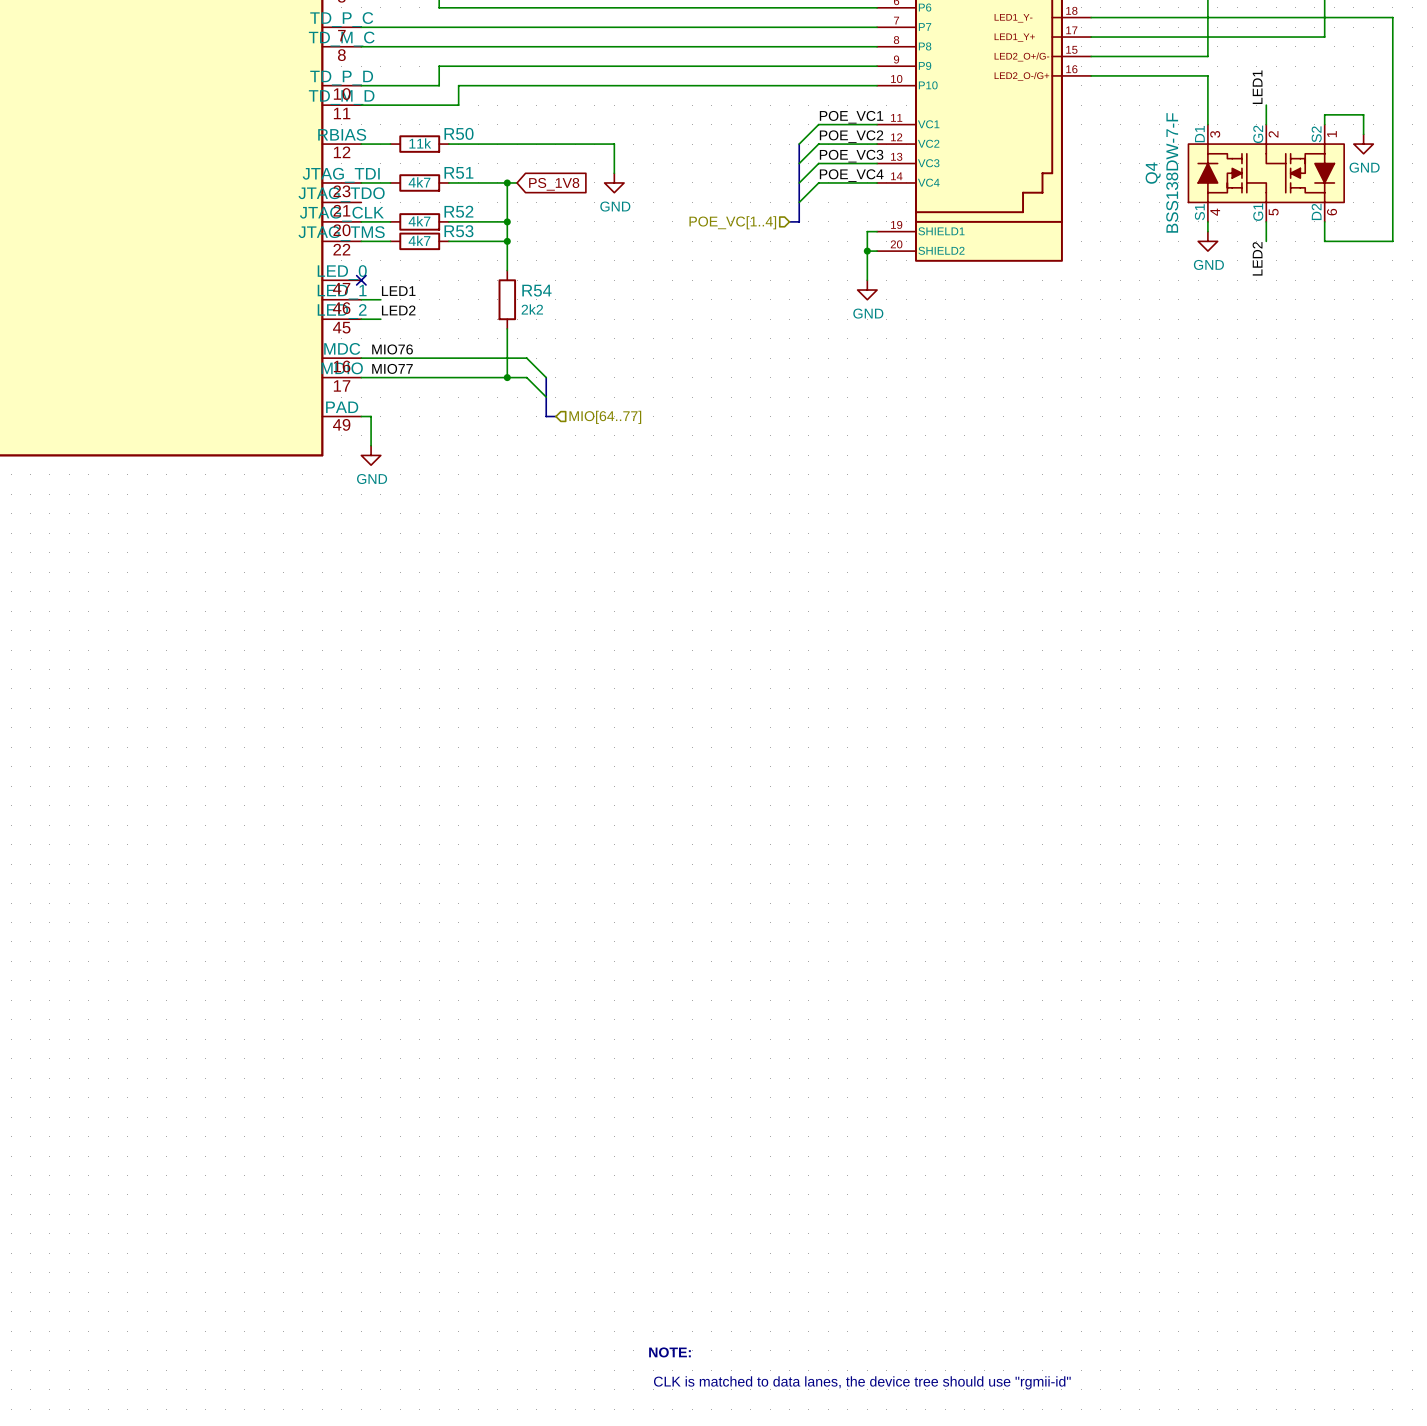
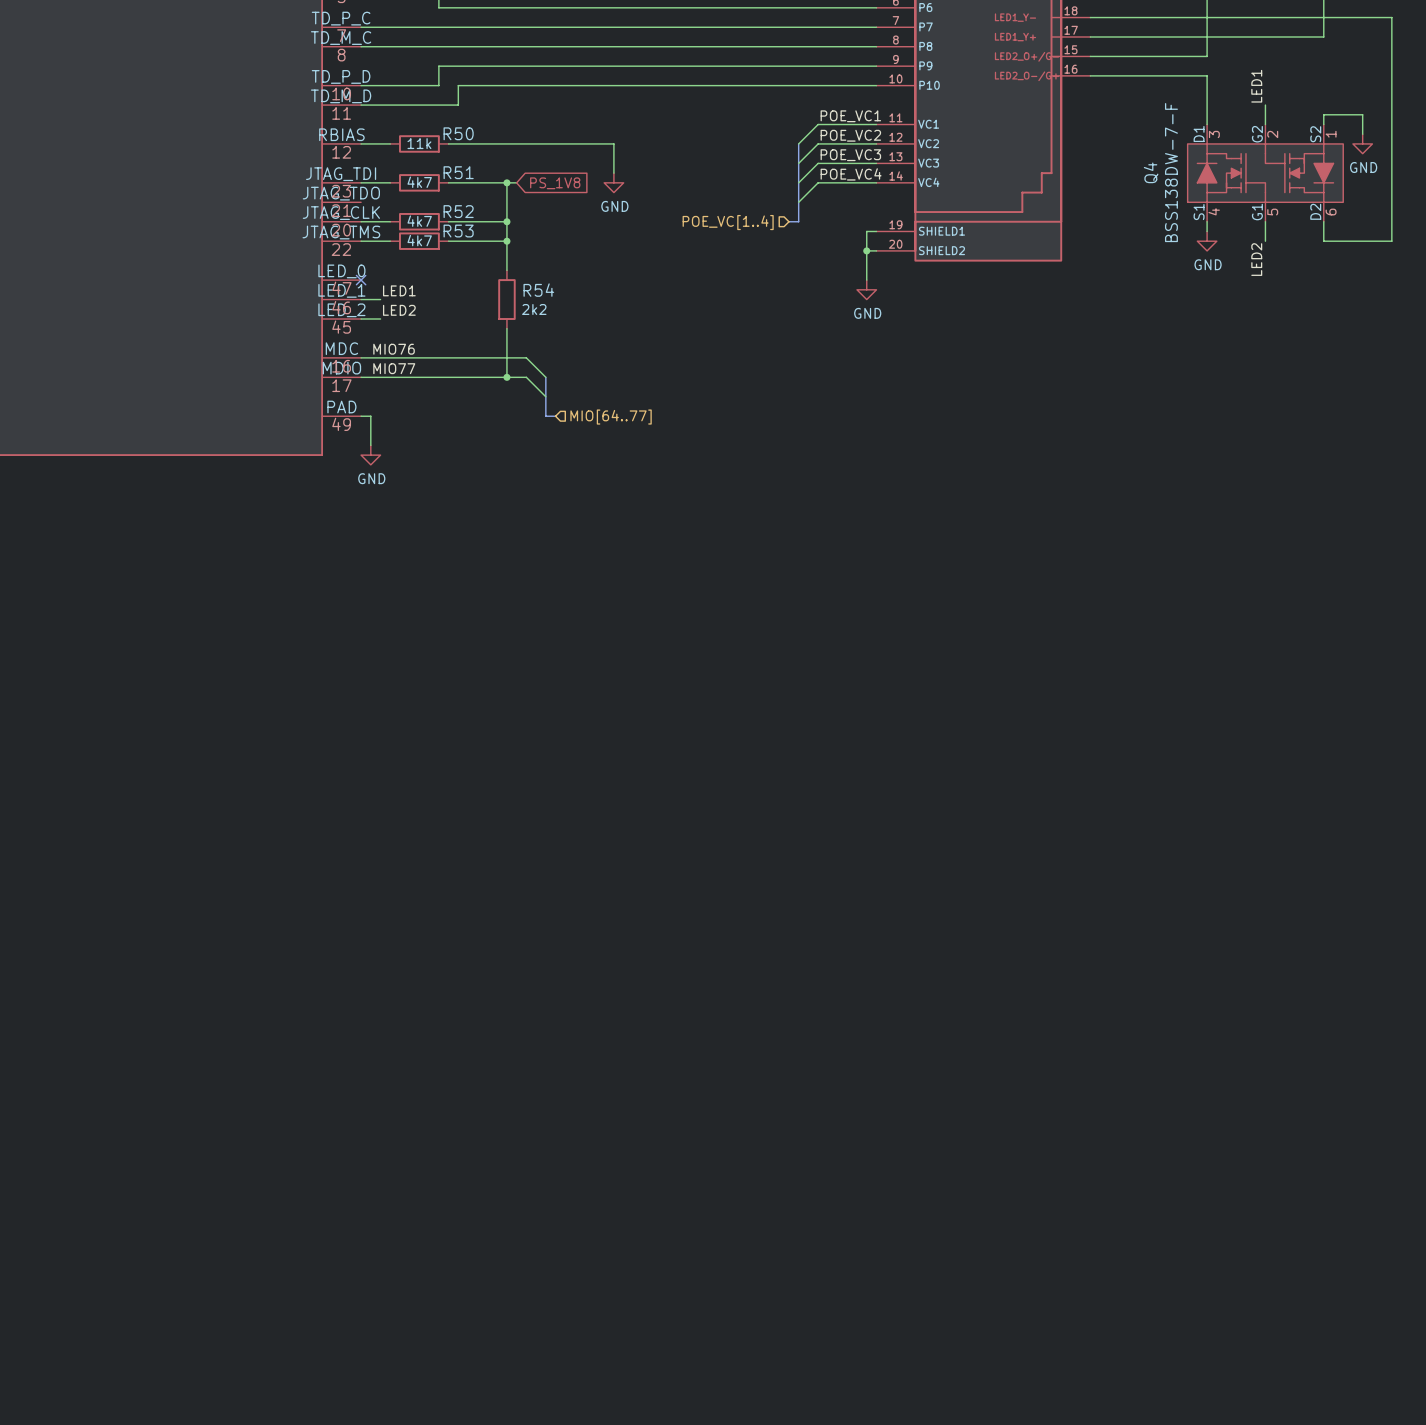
text: NOTE: (669, 1352) -> none
text: CLK is matched to data lanes, the device tree should use "rgmii-id" (862, 1382) -> none

